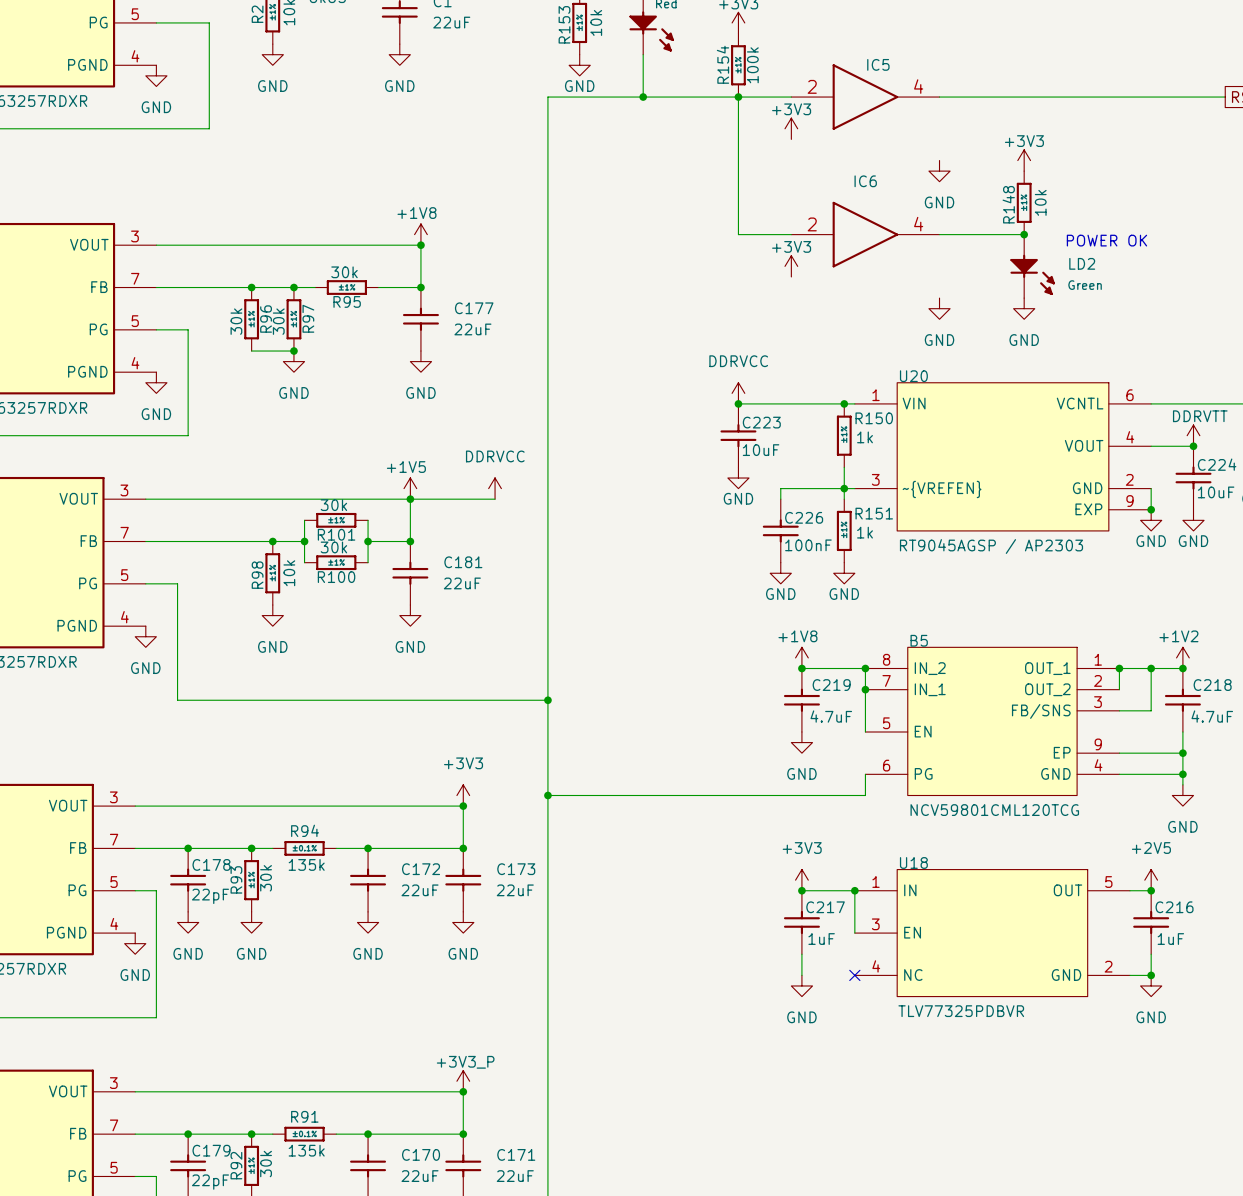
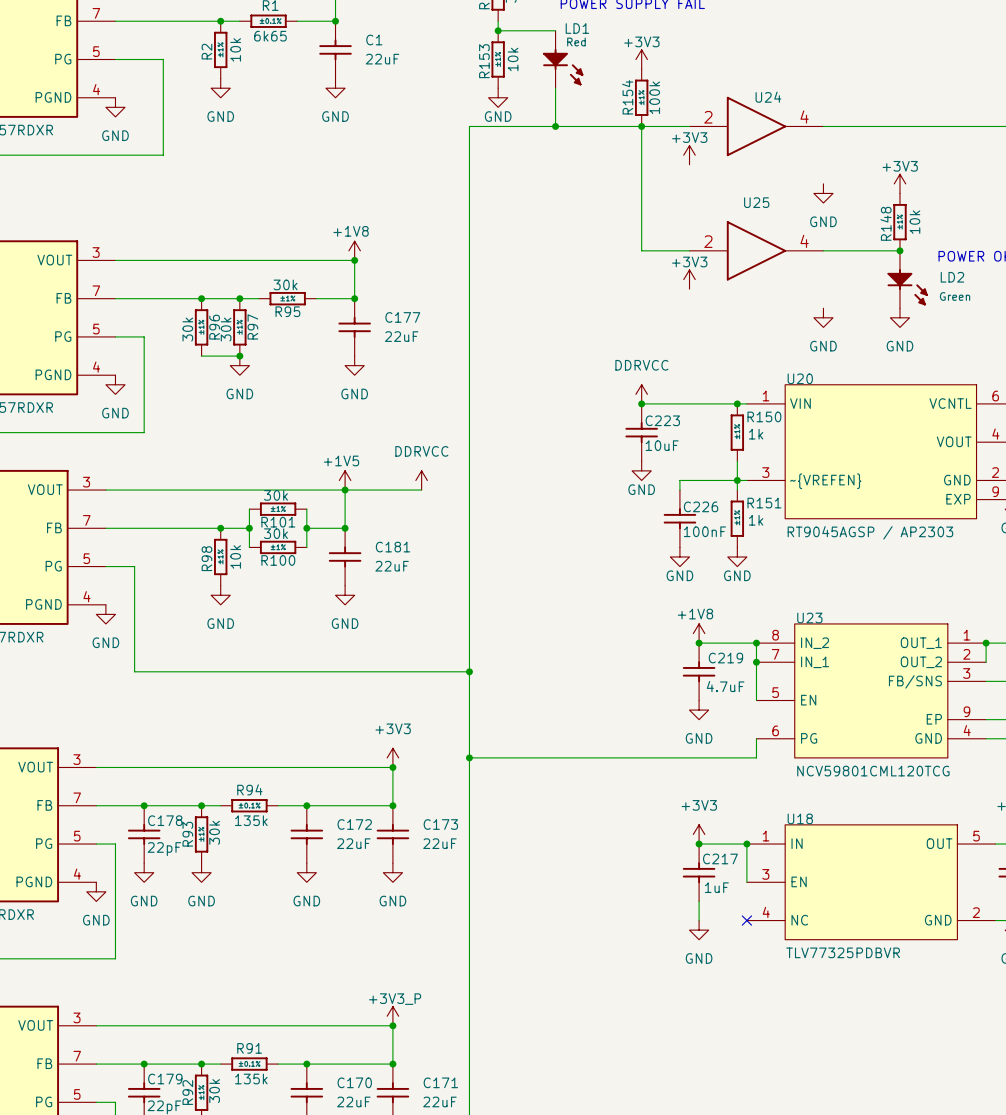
IC5 name: IC5 (878, 64) -> U24 (768, 97)
IC6 name: IC6 (865, 181) -> U25 (756, 202)
B5 name: B5 (919, 640) -> U23 (809, 618)

